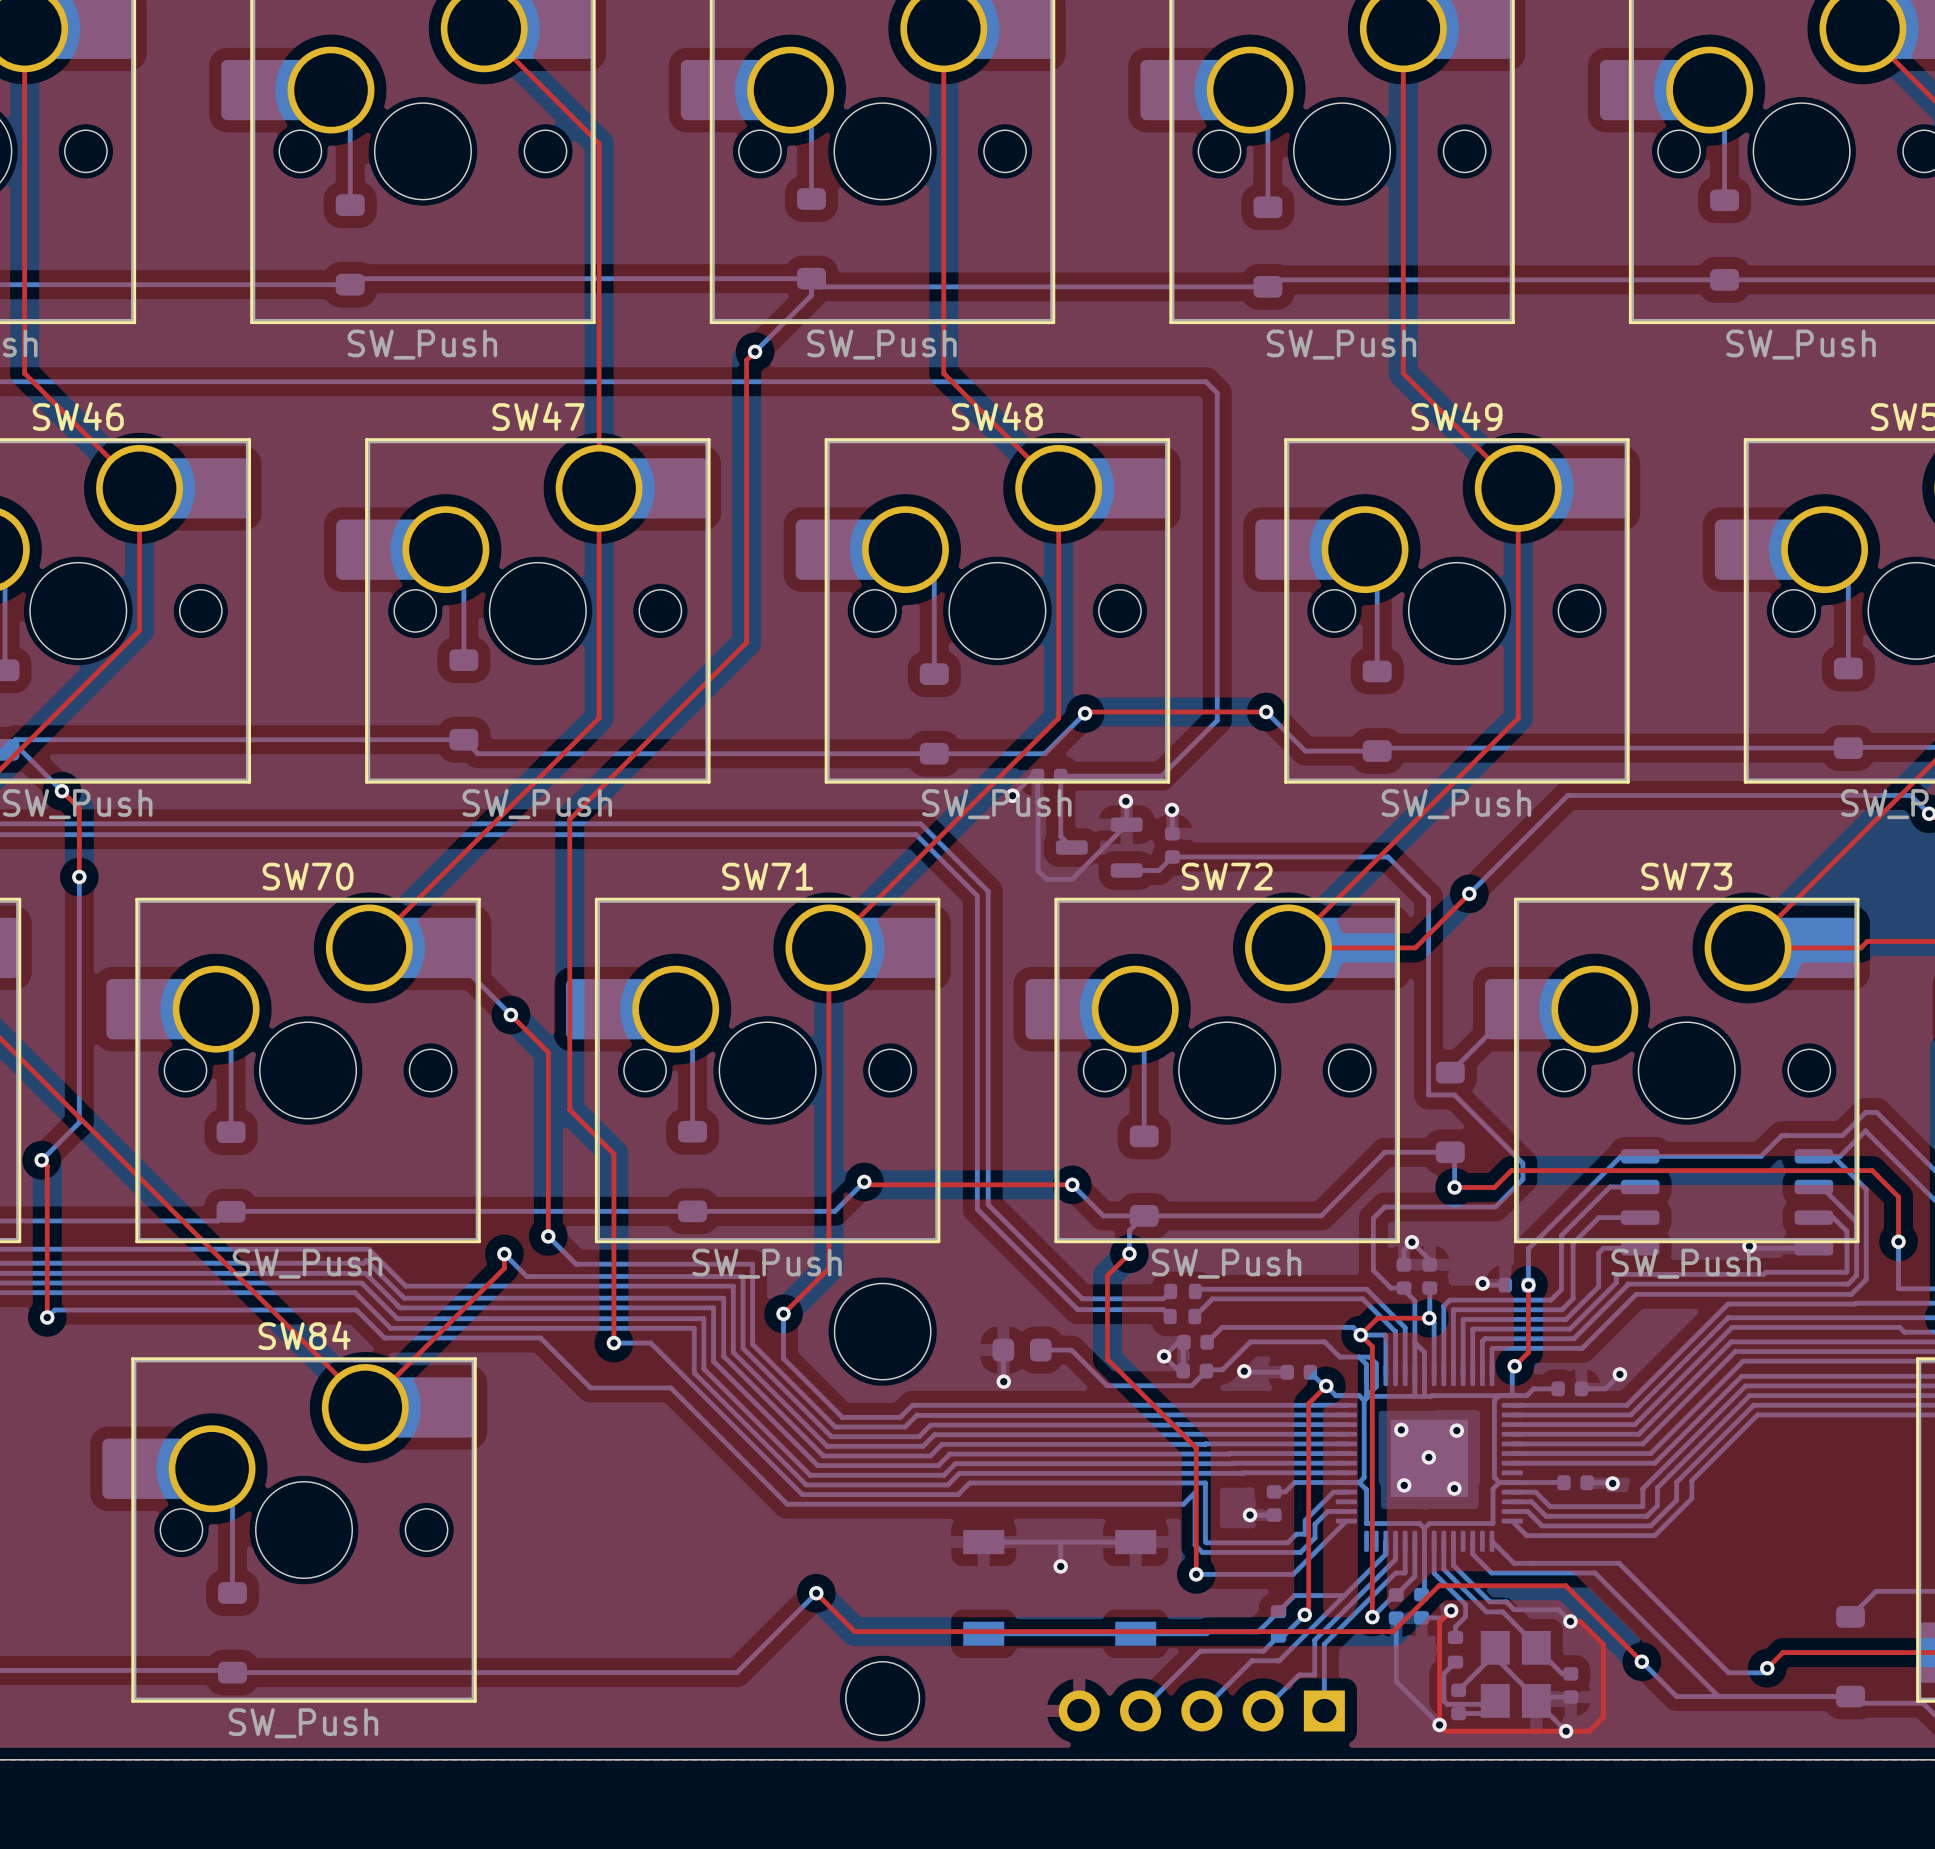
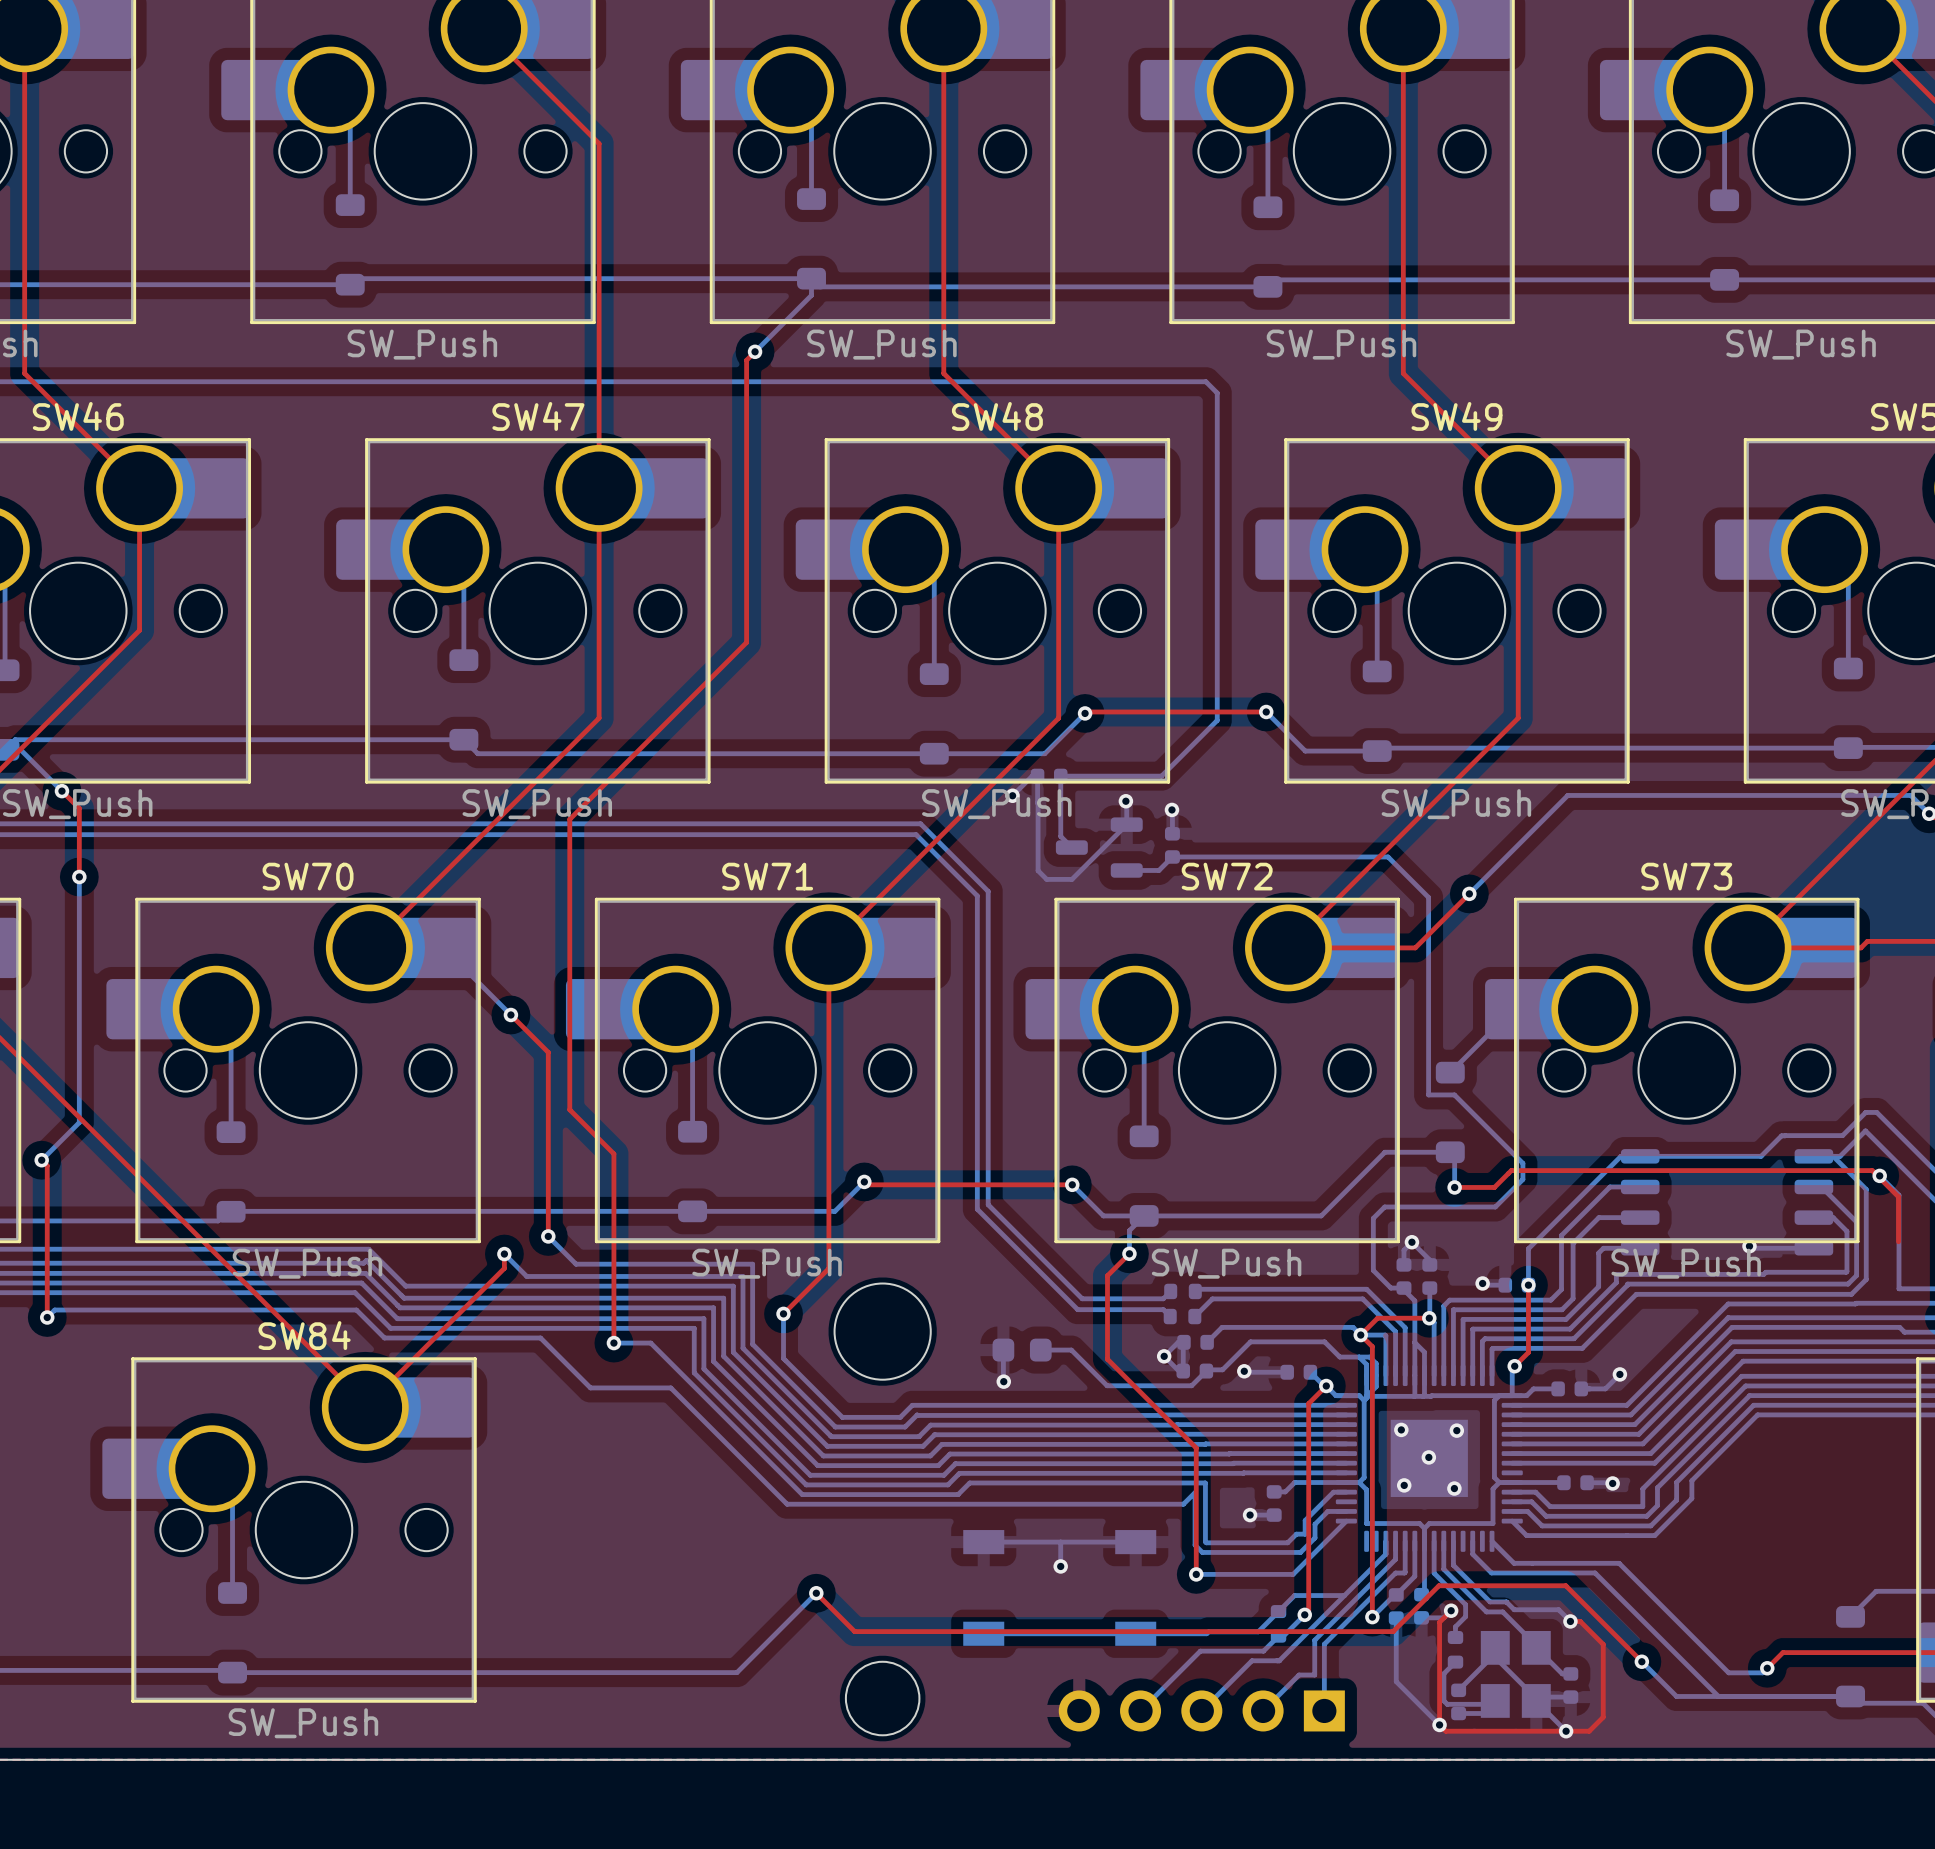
bottom track: (1898, 1241) (1899, 1288) -> (1879, 1175) (1899, 1195) (1899, 1288)
via position: (1898, 1241) -> (1879, 1175)

